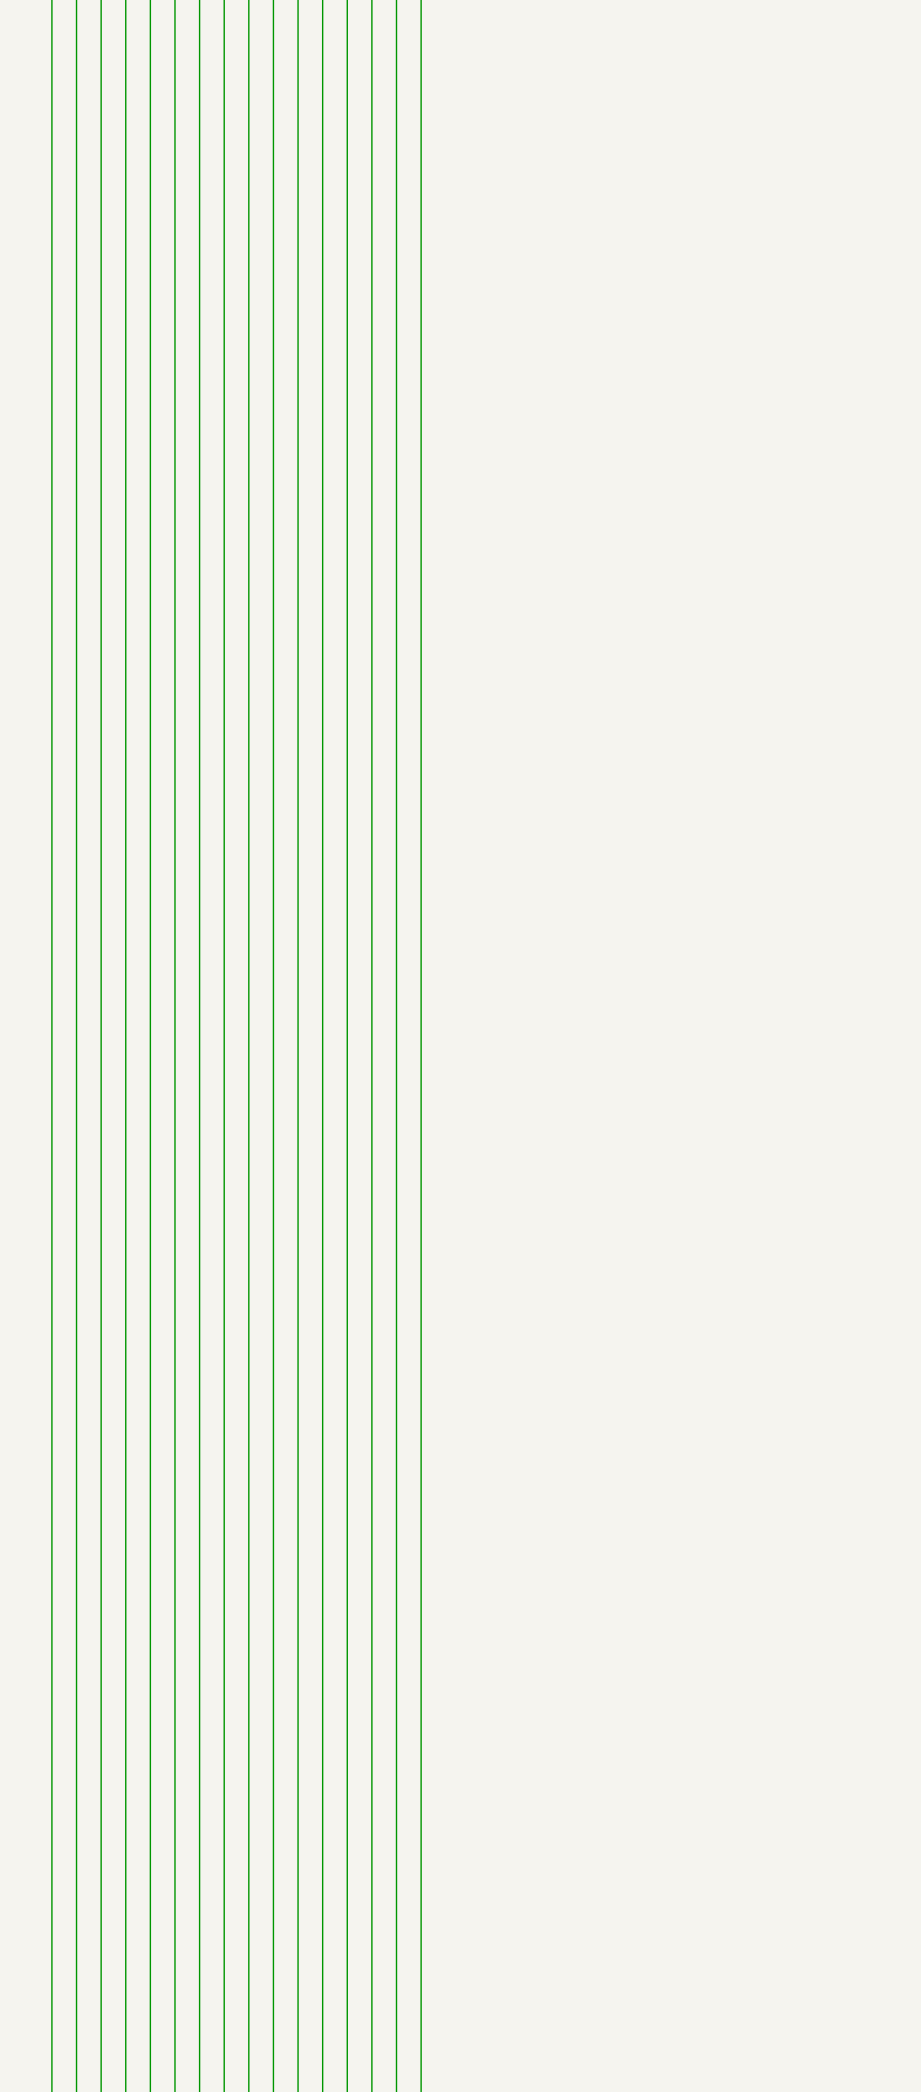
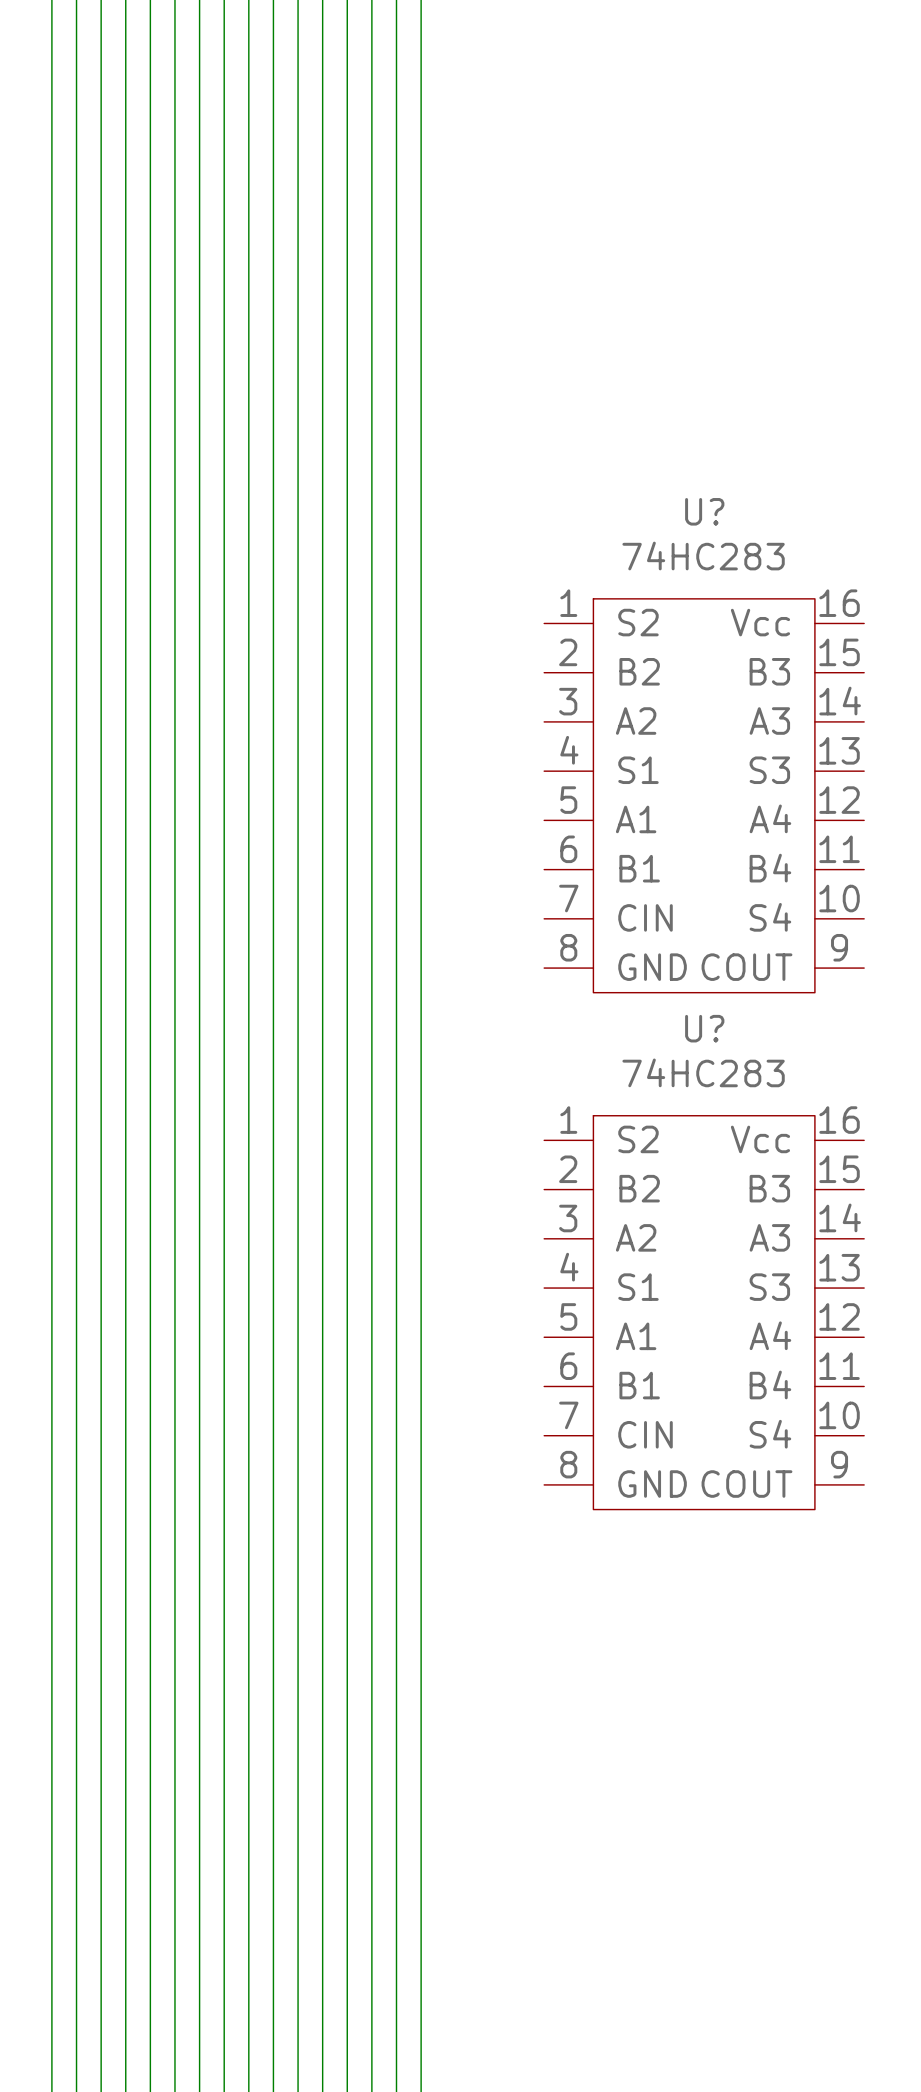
U?: none -> 74HC283 (704, 795)
U?: none -> 74HC283 (704, 1312)

